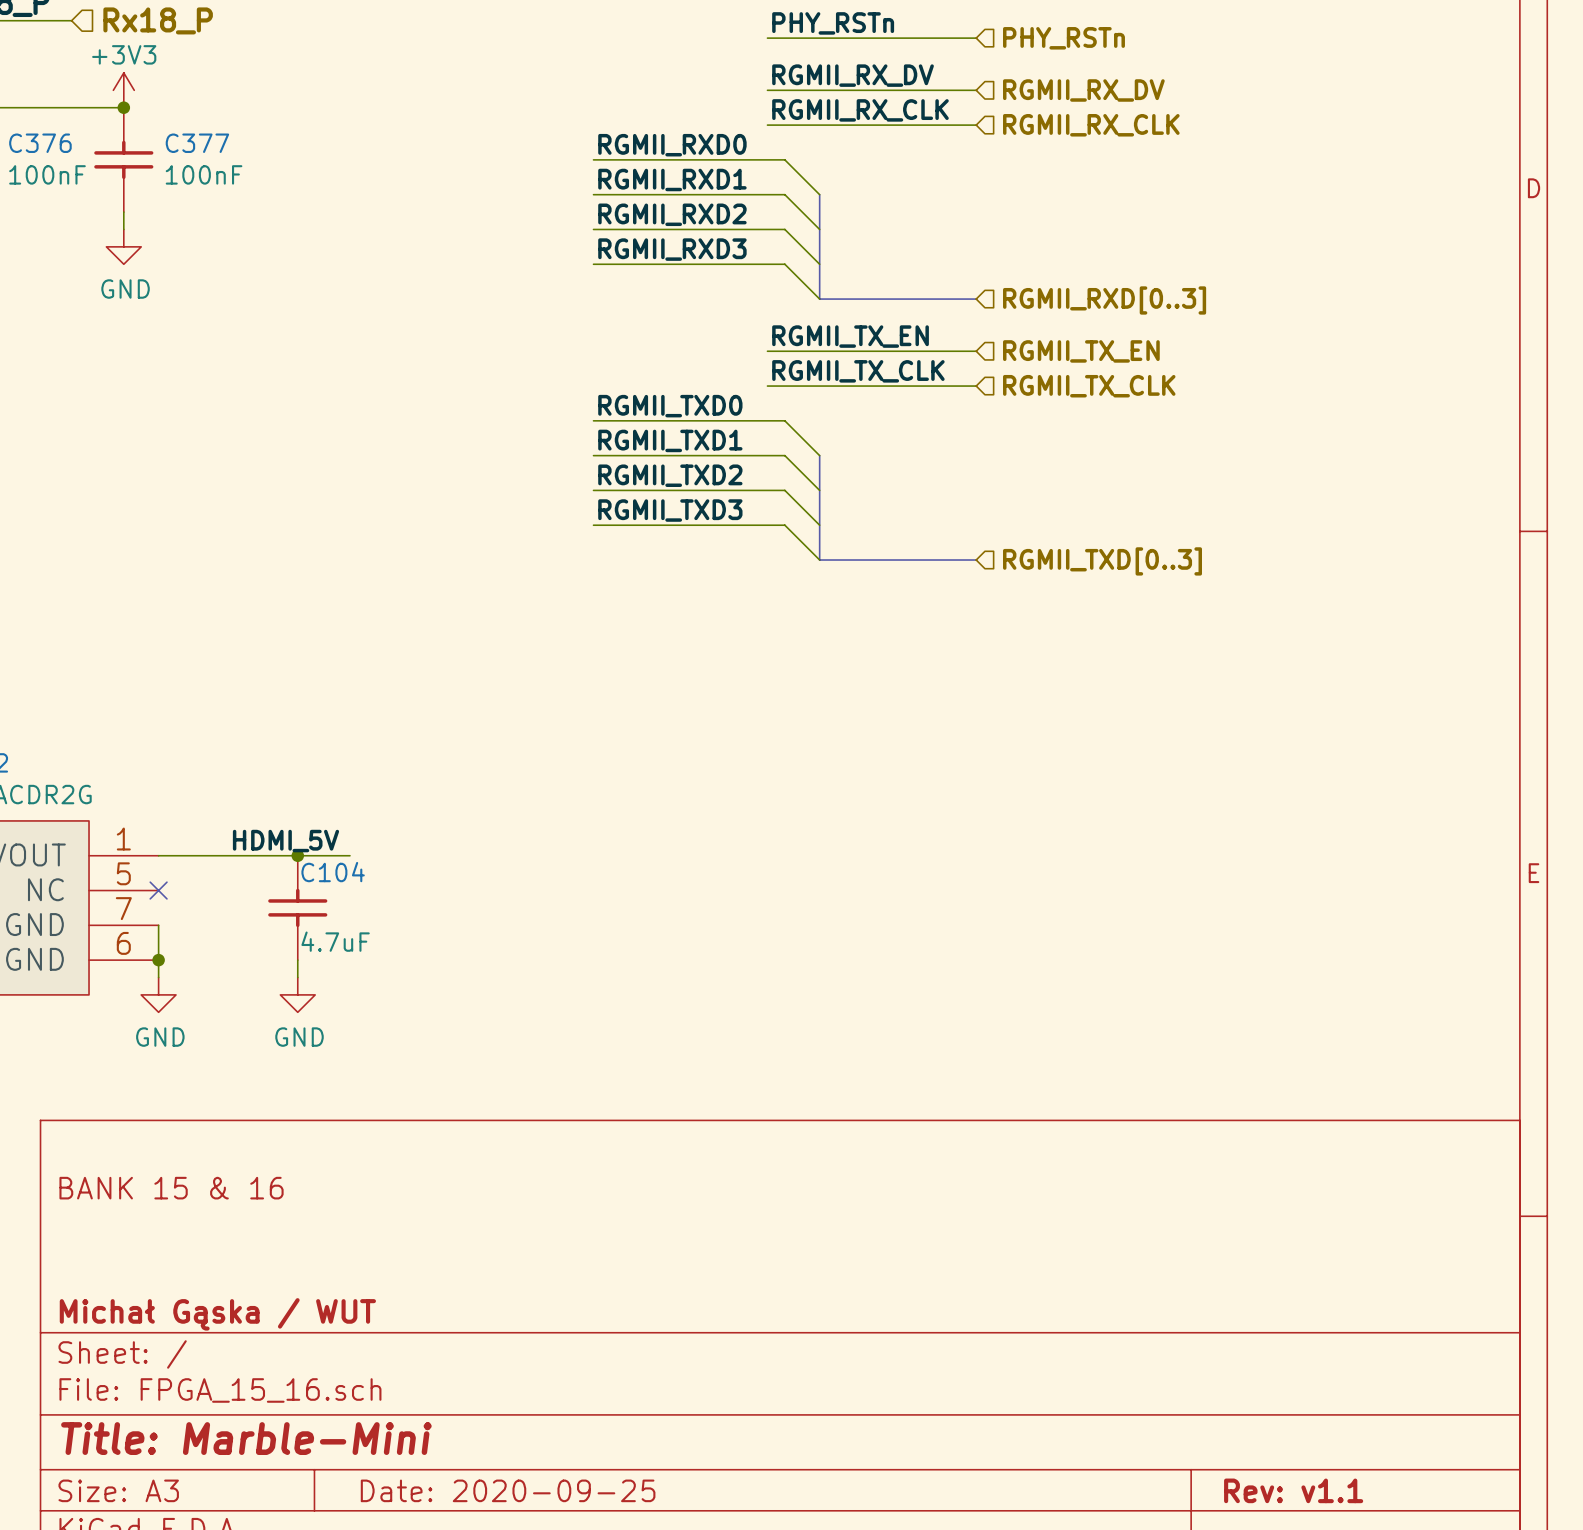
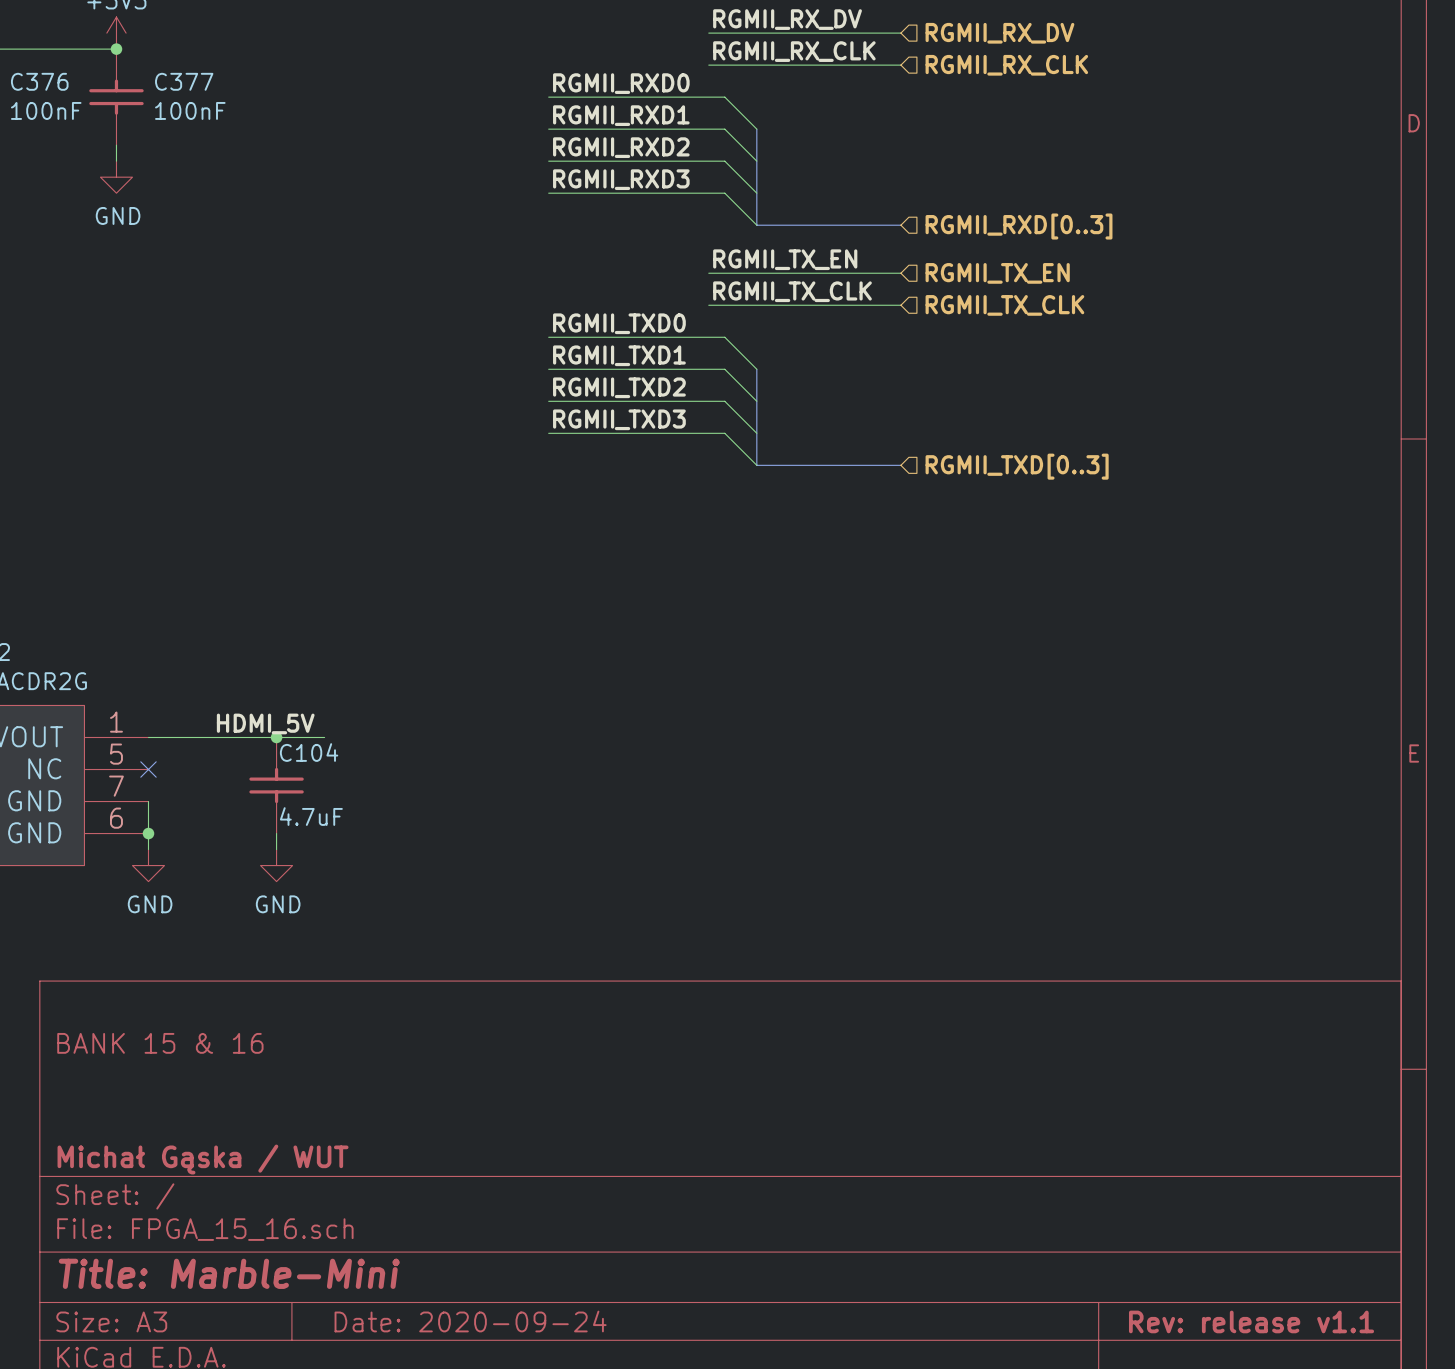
title block: Date: 2020-09-25 (508, 1490) -> Date: 2020-09-24 (470, 1321)
title block: Rev: v1.1 (1293, 1490) -> Rev: release v1.1 (1251, 1321)

